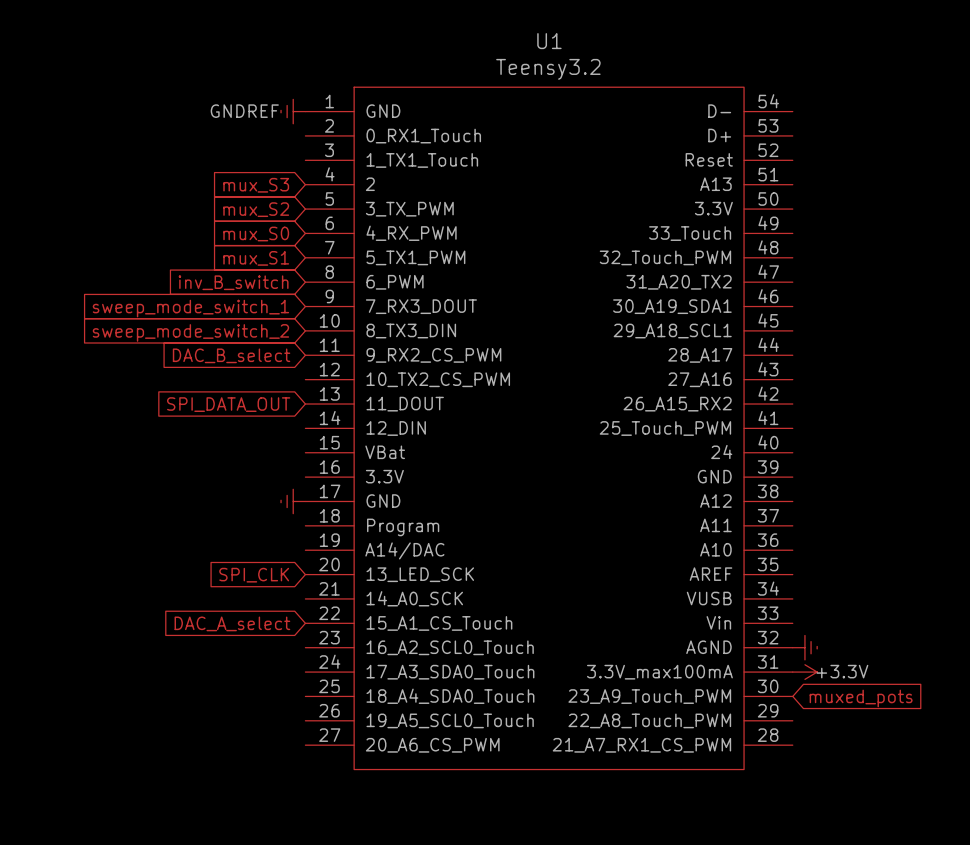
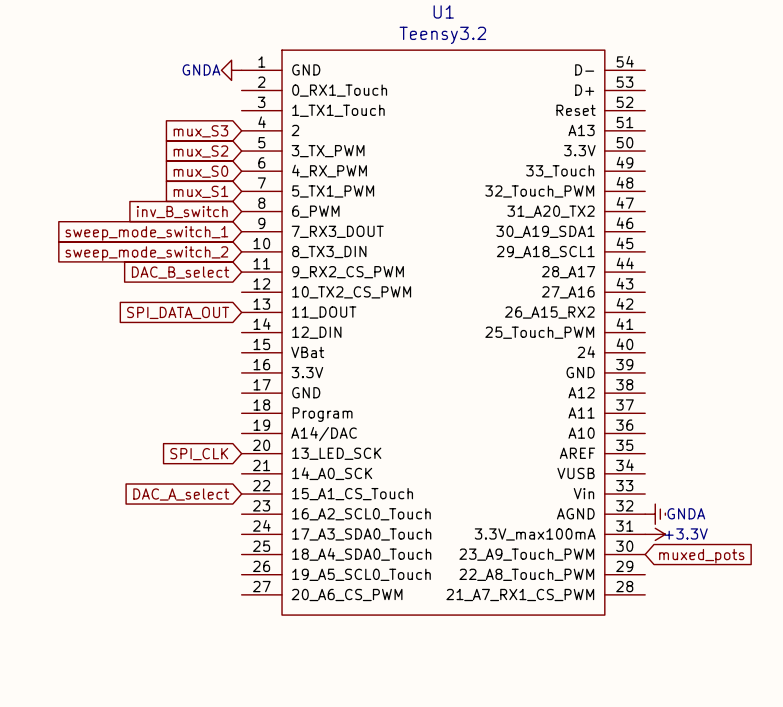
power symbol: GNDREF (293, 111) -> GNDA (231, 70)
power symbol: (293, 501) -> none
power symbol text: none -> GNDA (686, 513)

